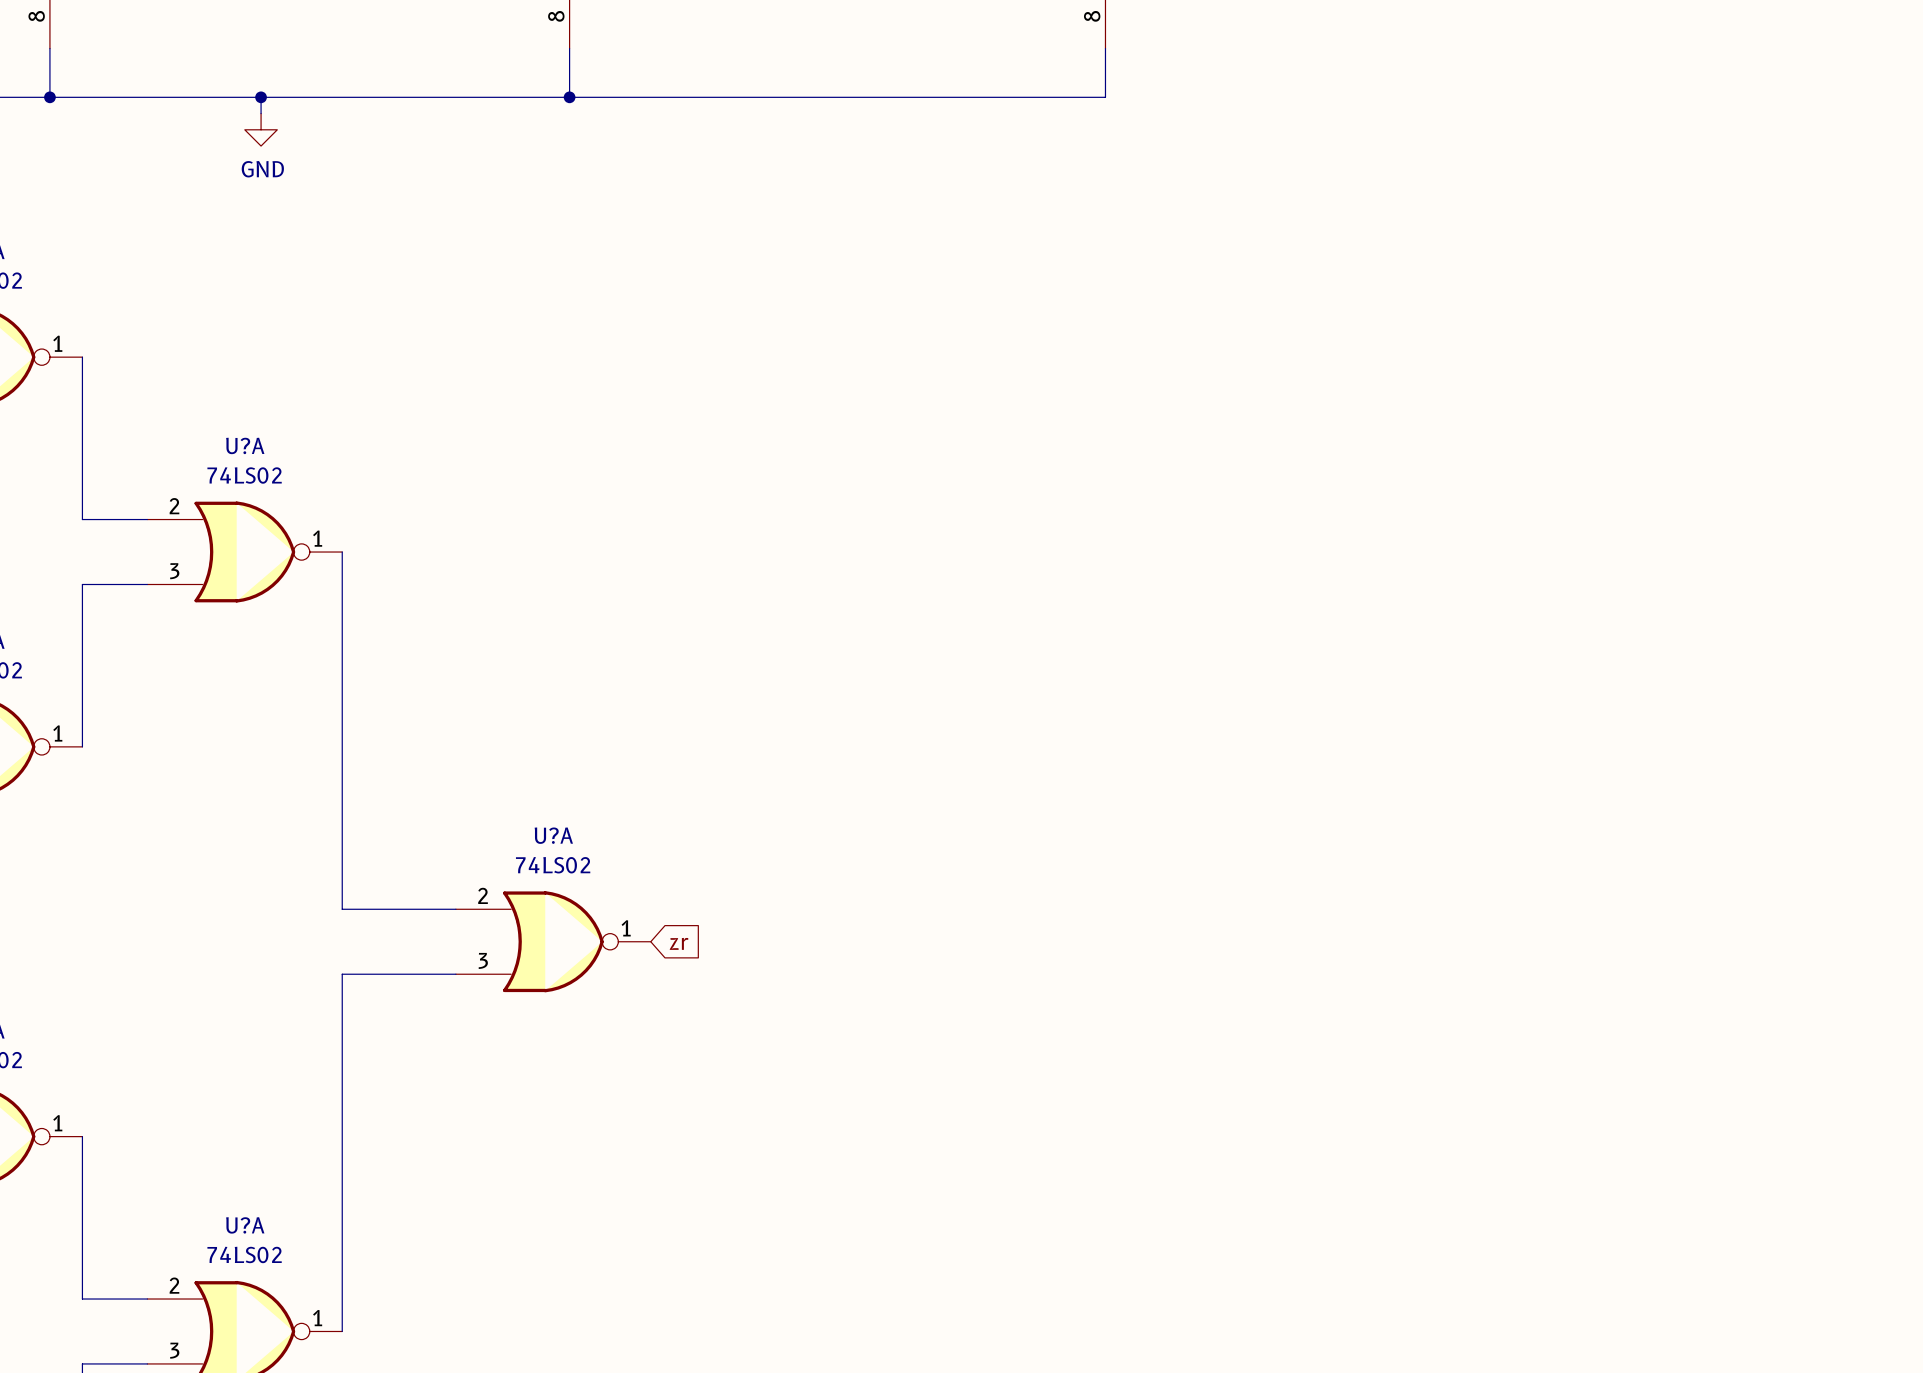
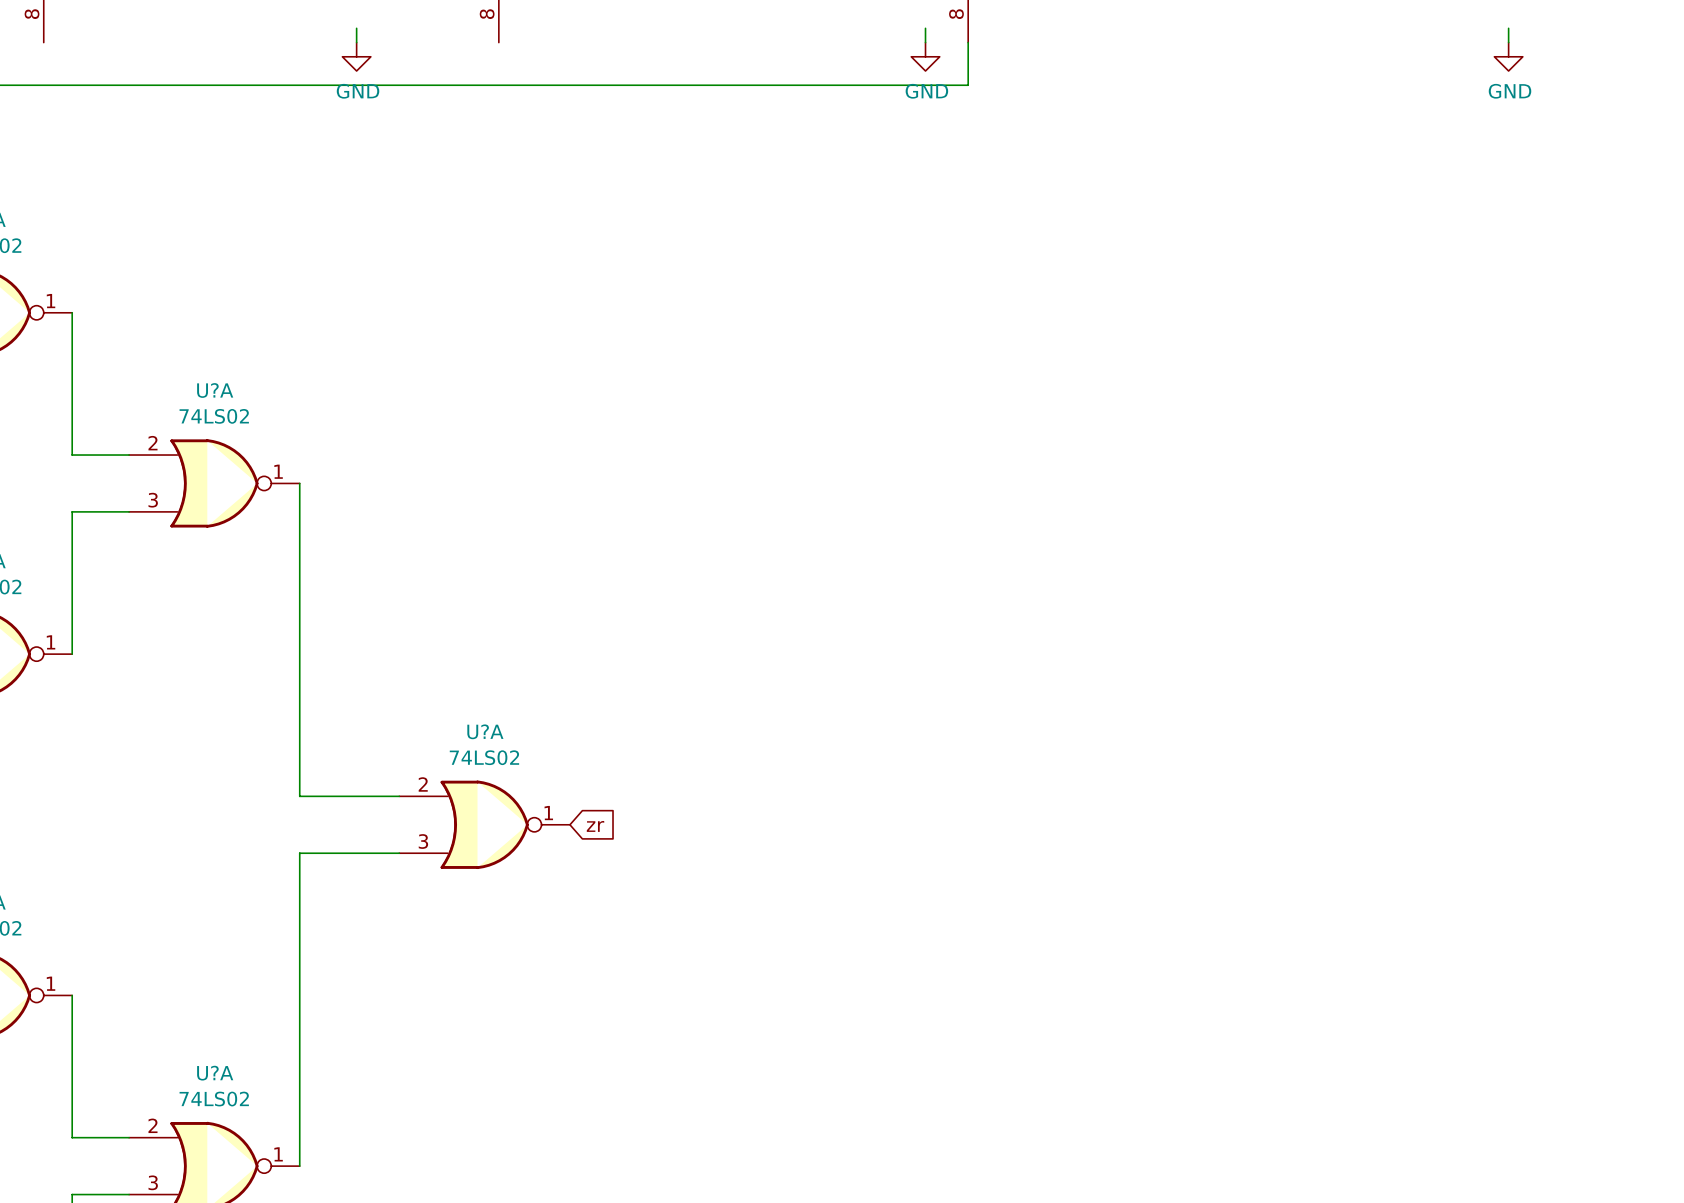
wire: none -> (925, 28) (925, 42)
wire: none -> (1508, 28) (1508, 42)
wire: (49, 48) (49, 97) -> none
wire: (569, 48) (569, 97) -> none
power symbol: none -> GND (925, 56)
power symbol: none -> GND (1508, 56)
junction: (49, 97) -> none
wire: (261, 97) (261, 113) -> (356, 28) (356, 42)
junction: (261, 97) -> none
junction: (569, 97) -> none
power symbol position: GND (261, 129) -> GND (356, 56)

